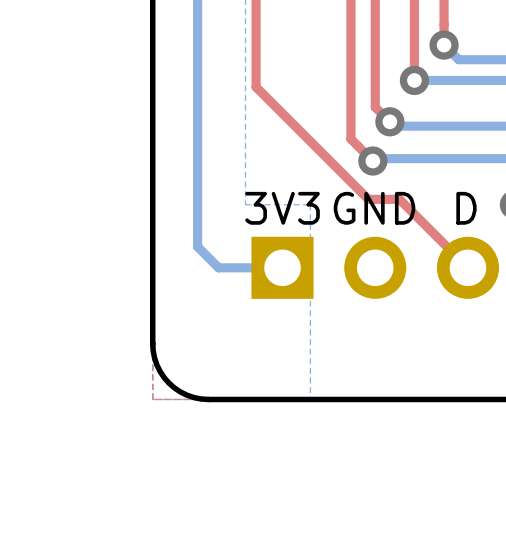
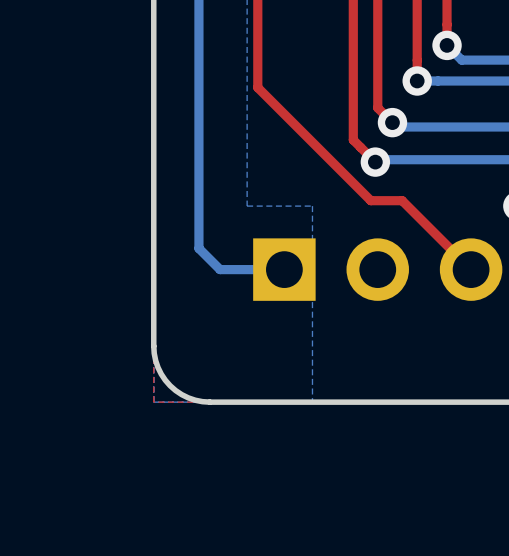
text: 3V3 (282, 208) -> none
text: GND (374, 208) -> none
text: D (466, 208) -> none

